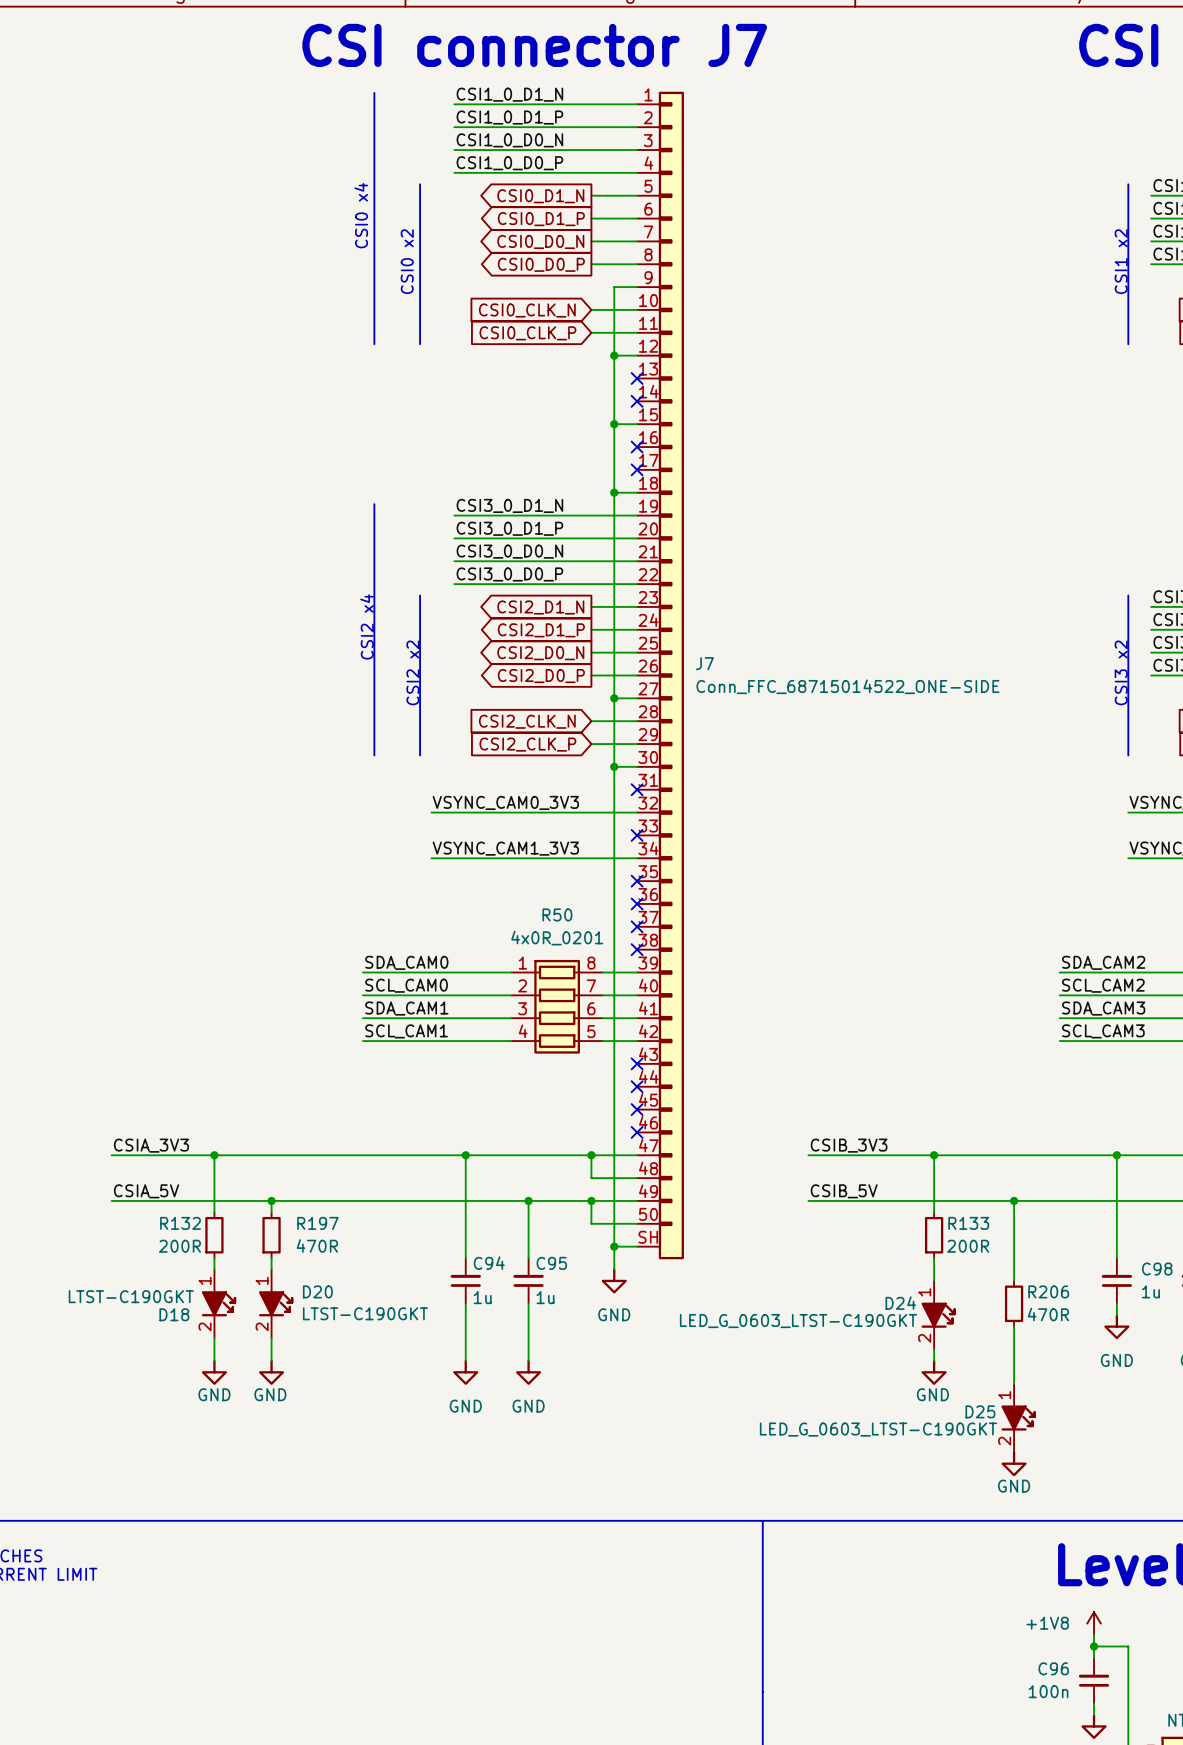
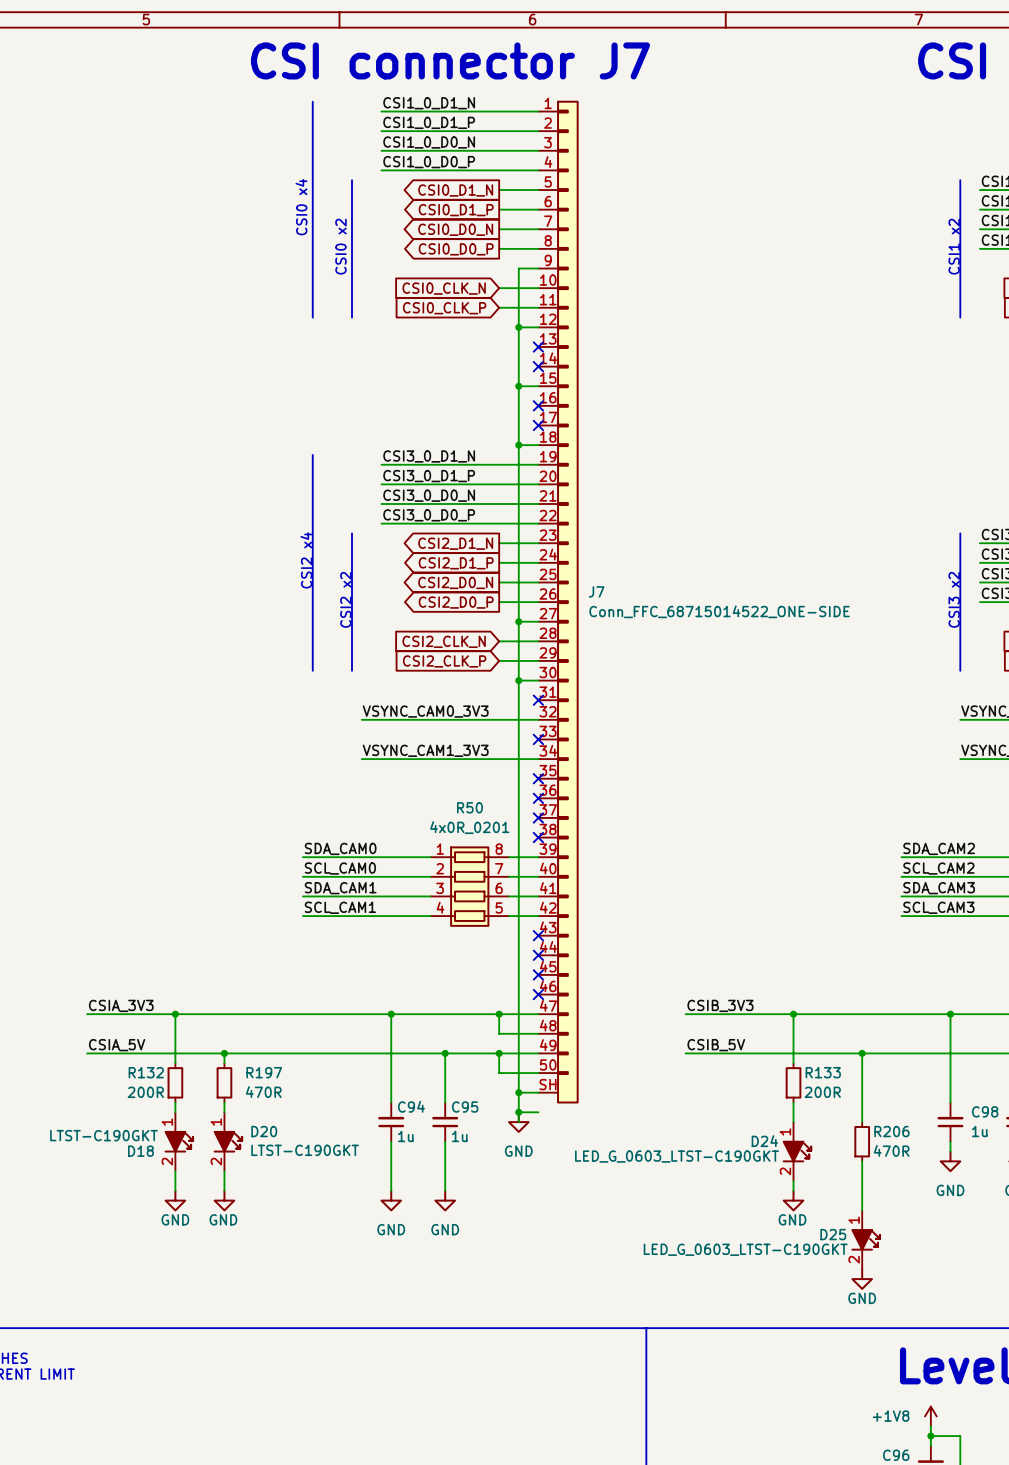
junction: none -> (518, 1112)
wire: none -> (538, 1112) (518, 1112) (518, 1122)

